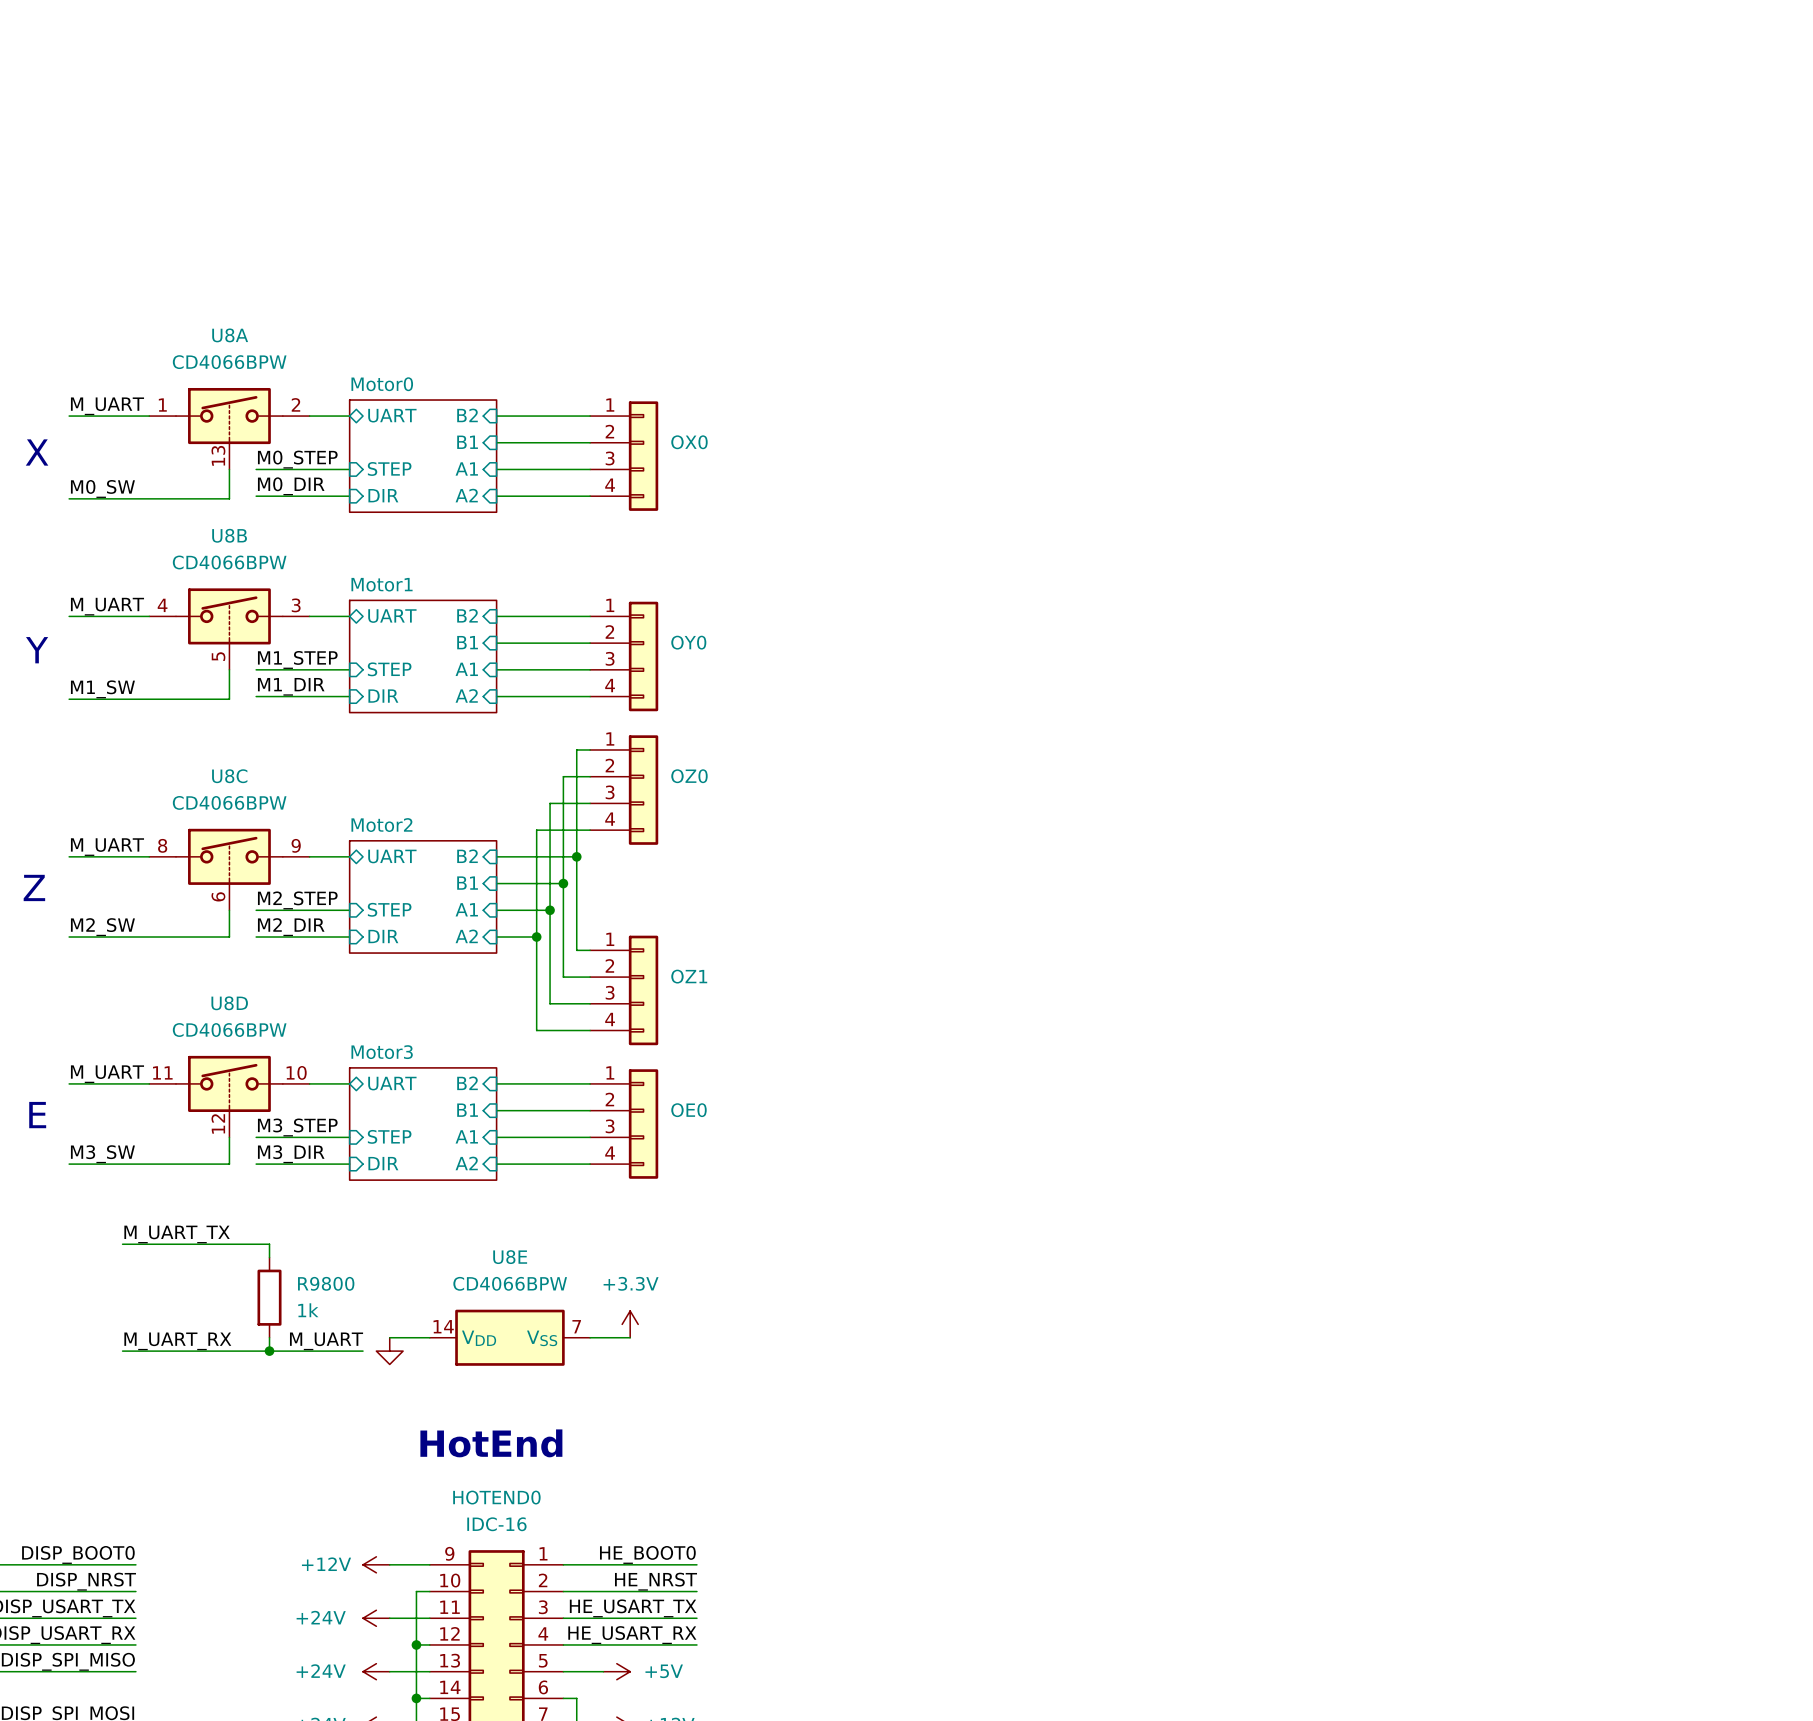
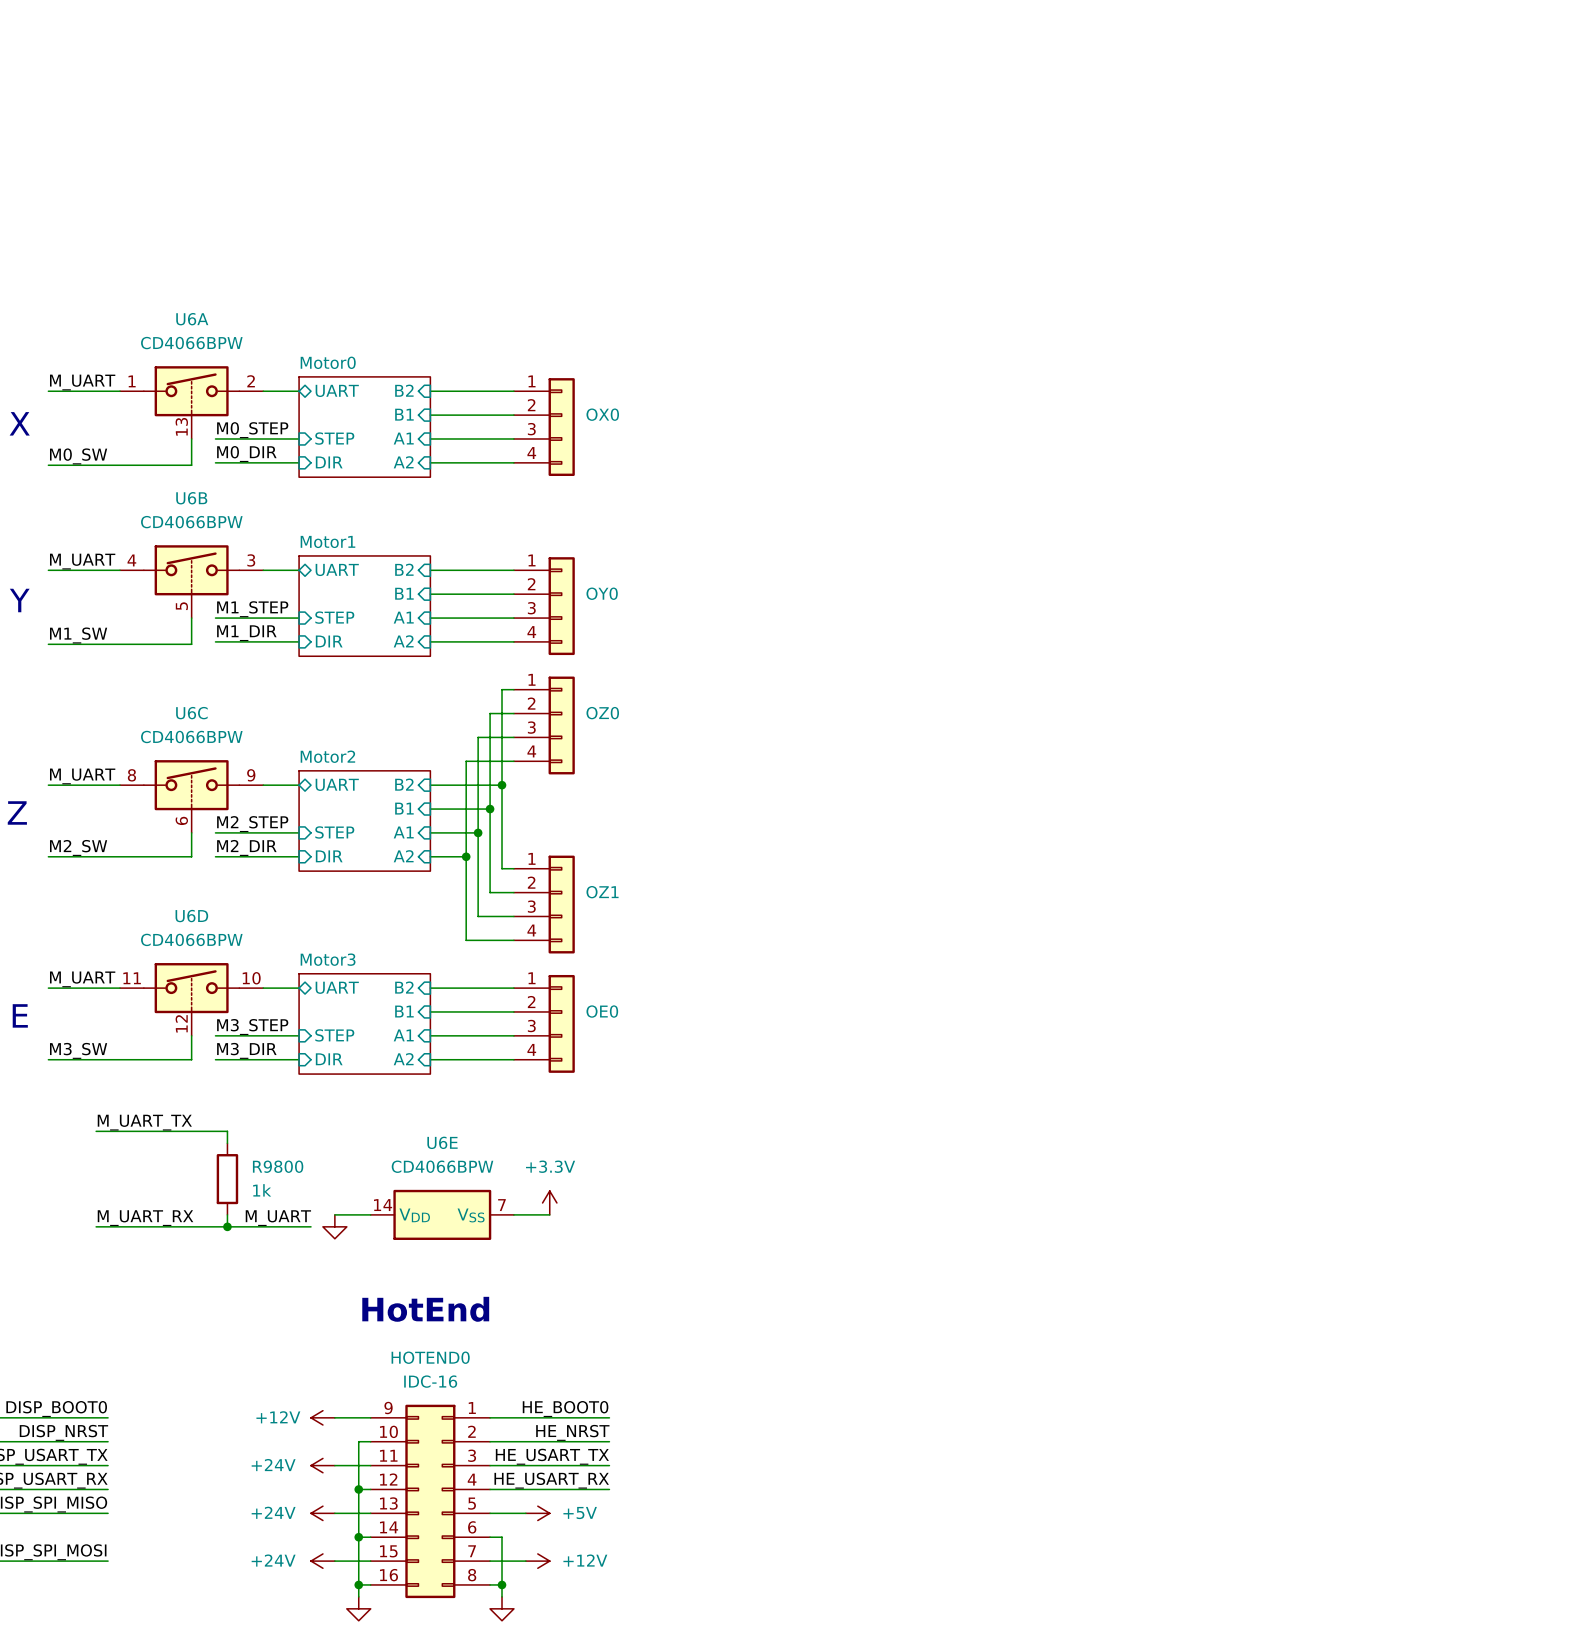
U8A name: U8A (230, 335) -> U6A (192, 319)
U8B name: U8B (229, 535) -> U6B (191, 498)
U8C name: U8C (229, 776) -> U6C (191, 713)
U8D name: U8D (229, 1003) -> U6D (191, 916)
U8E name: U8E (510, 1257) -> U6E (442, 1142)

